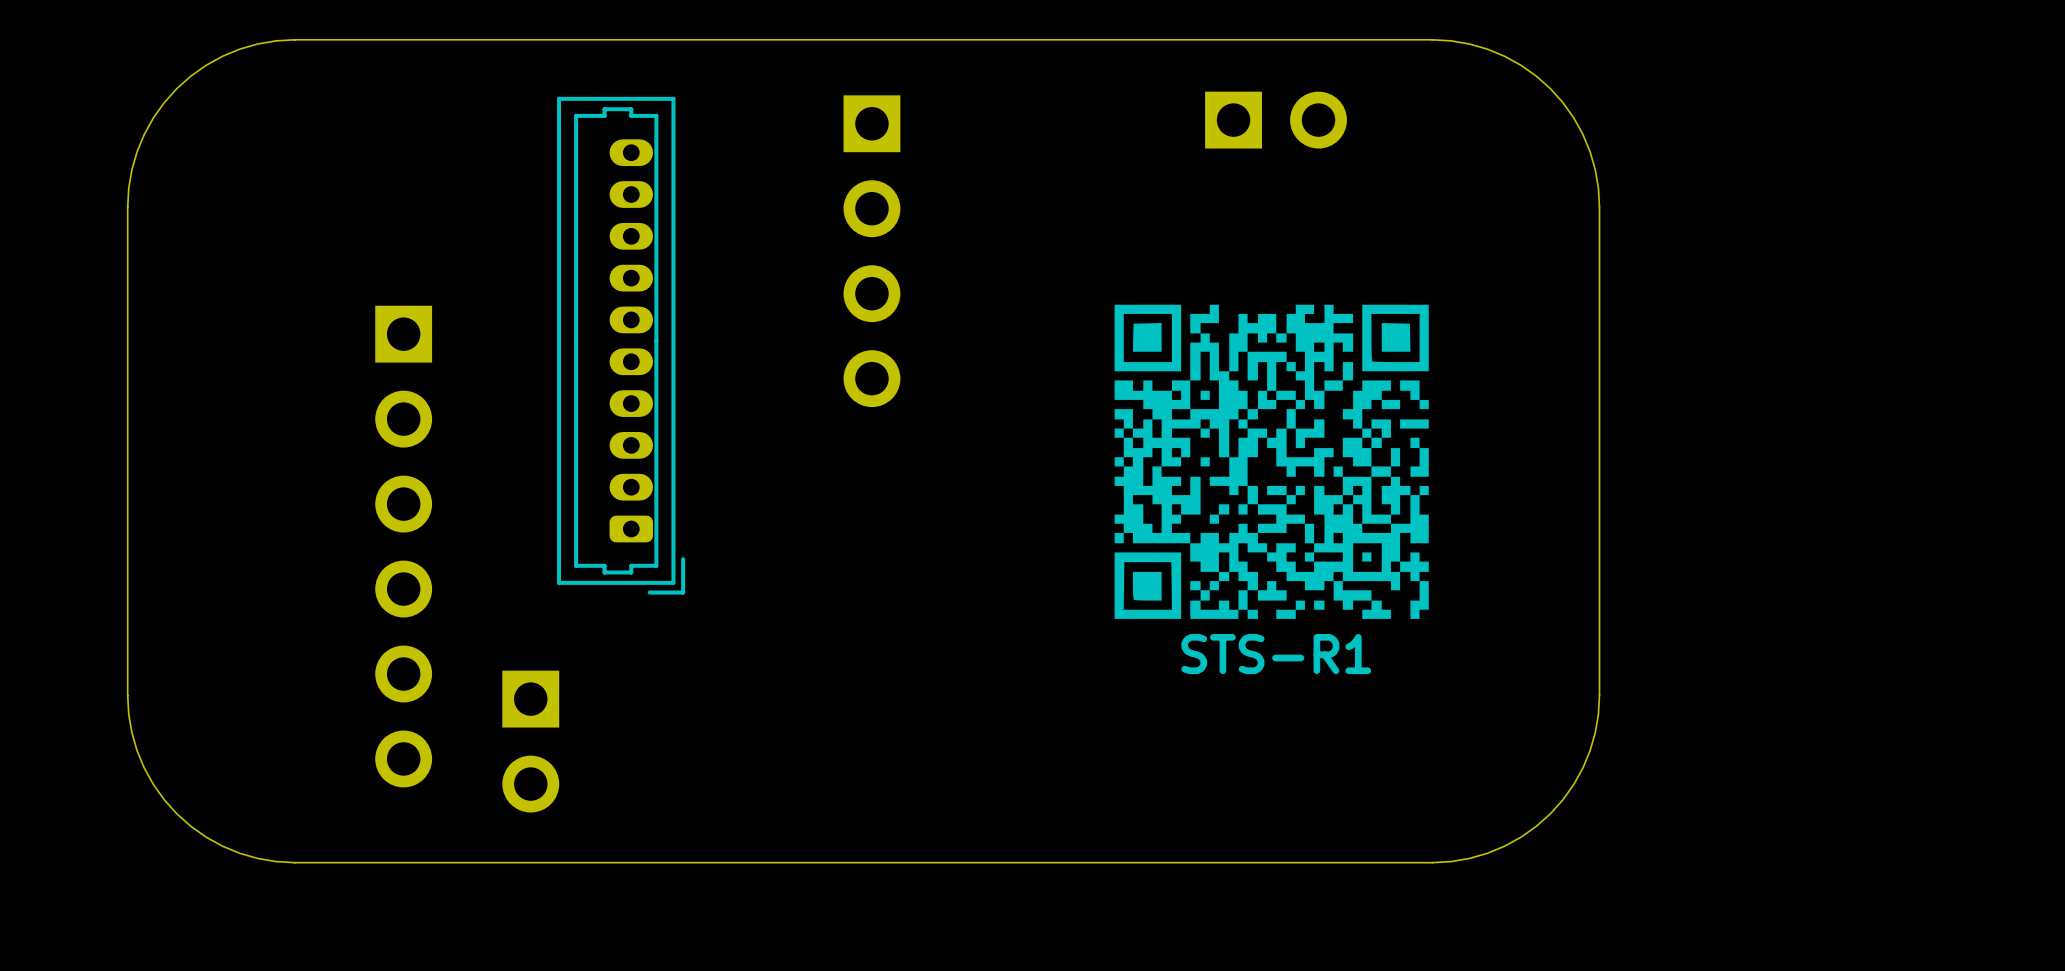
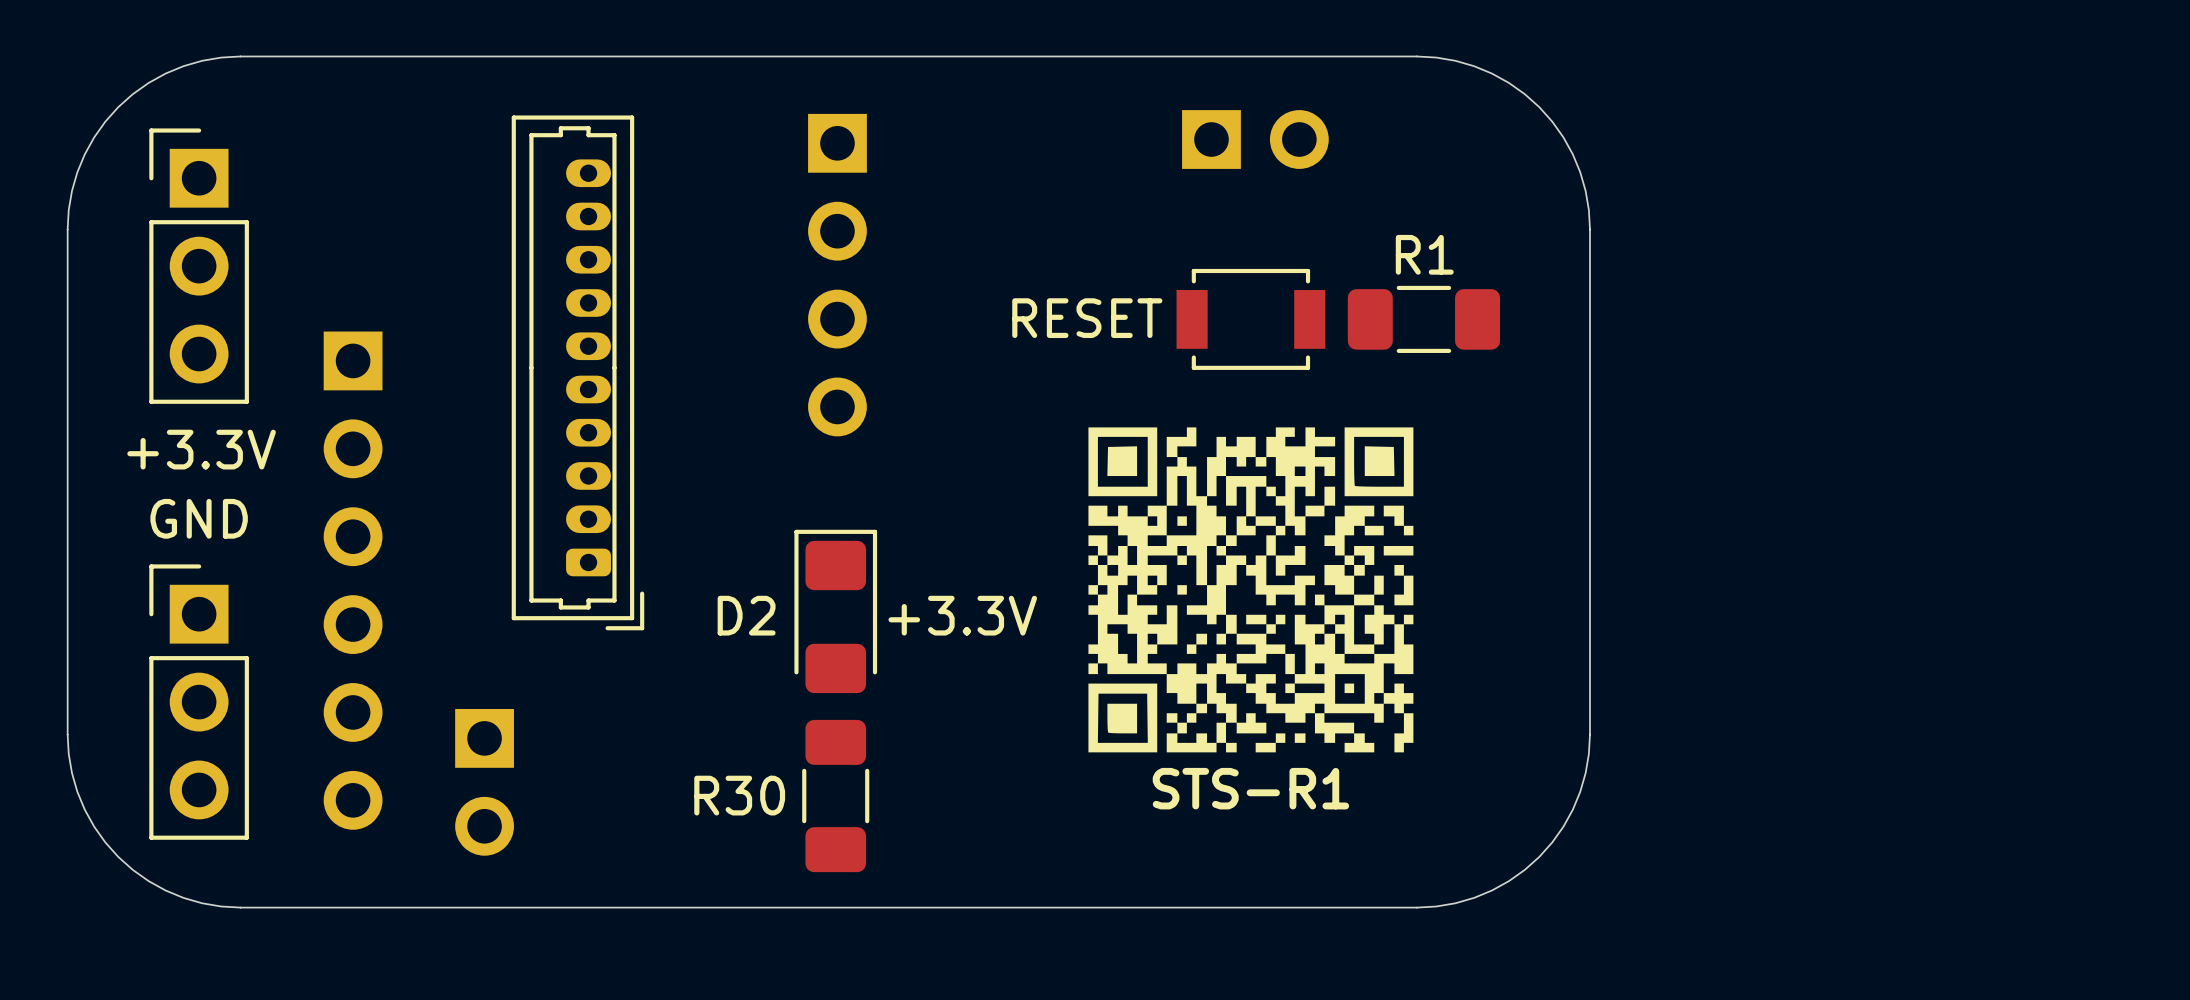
part: none -> (199, 266)
text: none -> RESET (1087, 318)
part: none -> (1250, 319)
R1: none -> (1423, 319)
text: none -> +3.3V (201, 449)
drawing position: (1271, 461) -> (1250, 589)
text: none -> GND (199, 518)
D2: none -> (835, 611)
text: none -> +3.3V (962, 615)
text position: STS-R1 (1276, 654) -> STS-R1 (1250, 788)
part: none -> (199, 702)
R30: none -> (835, 796)

